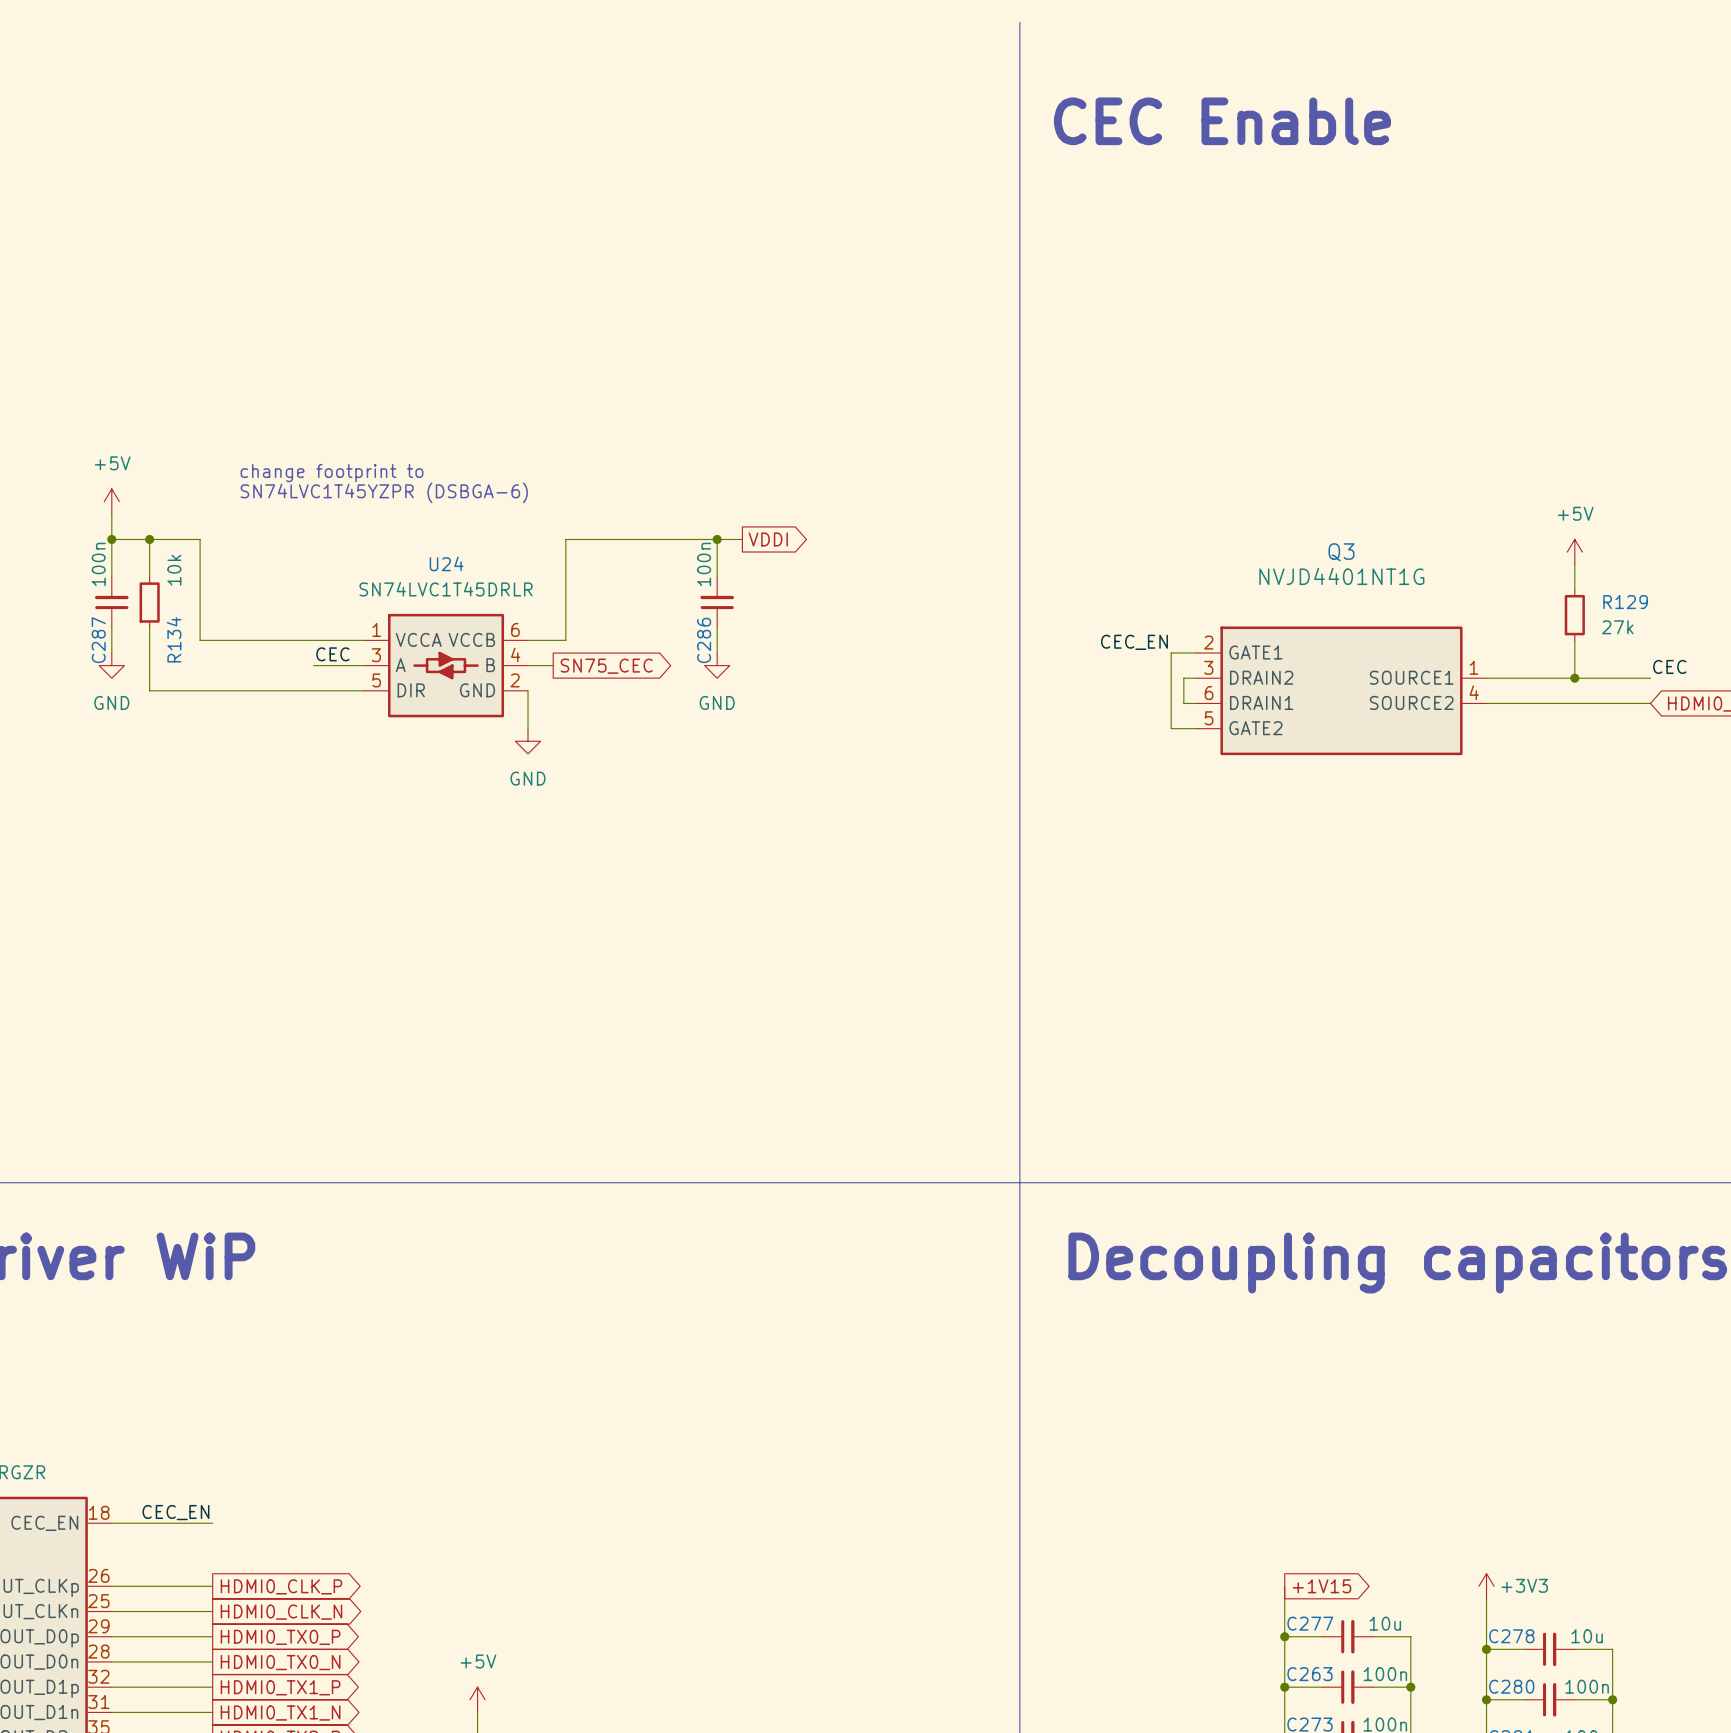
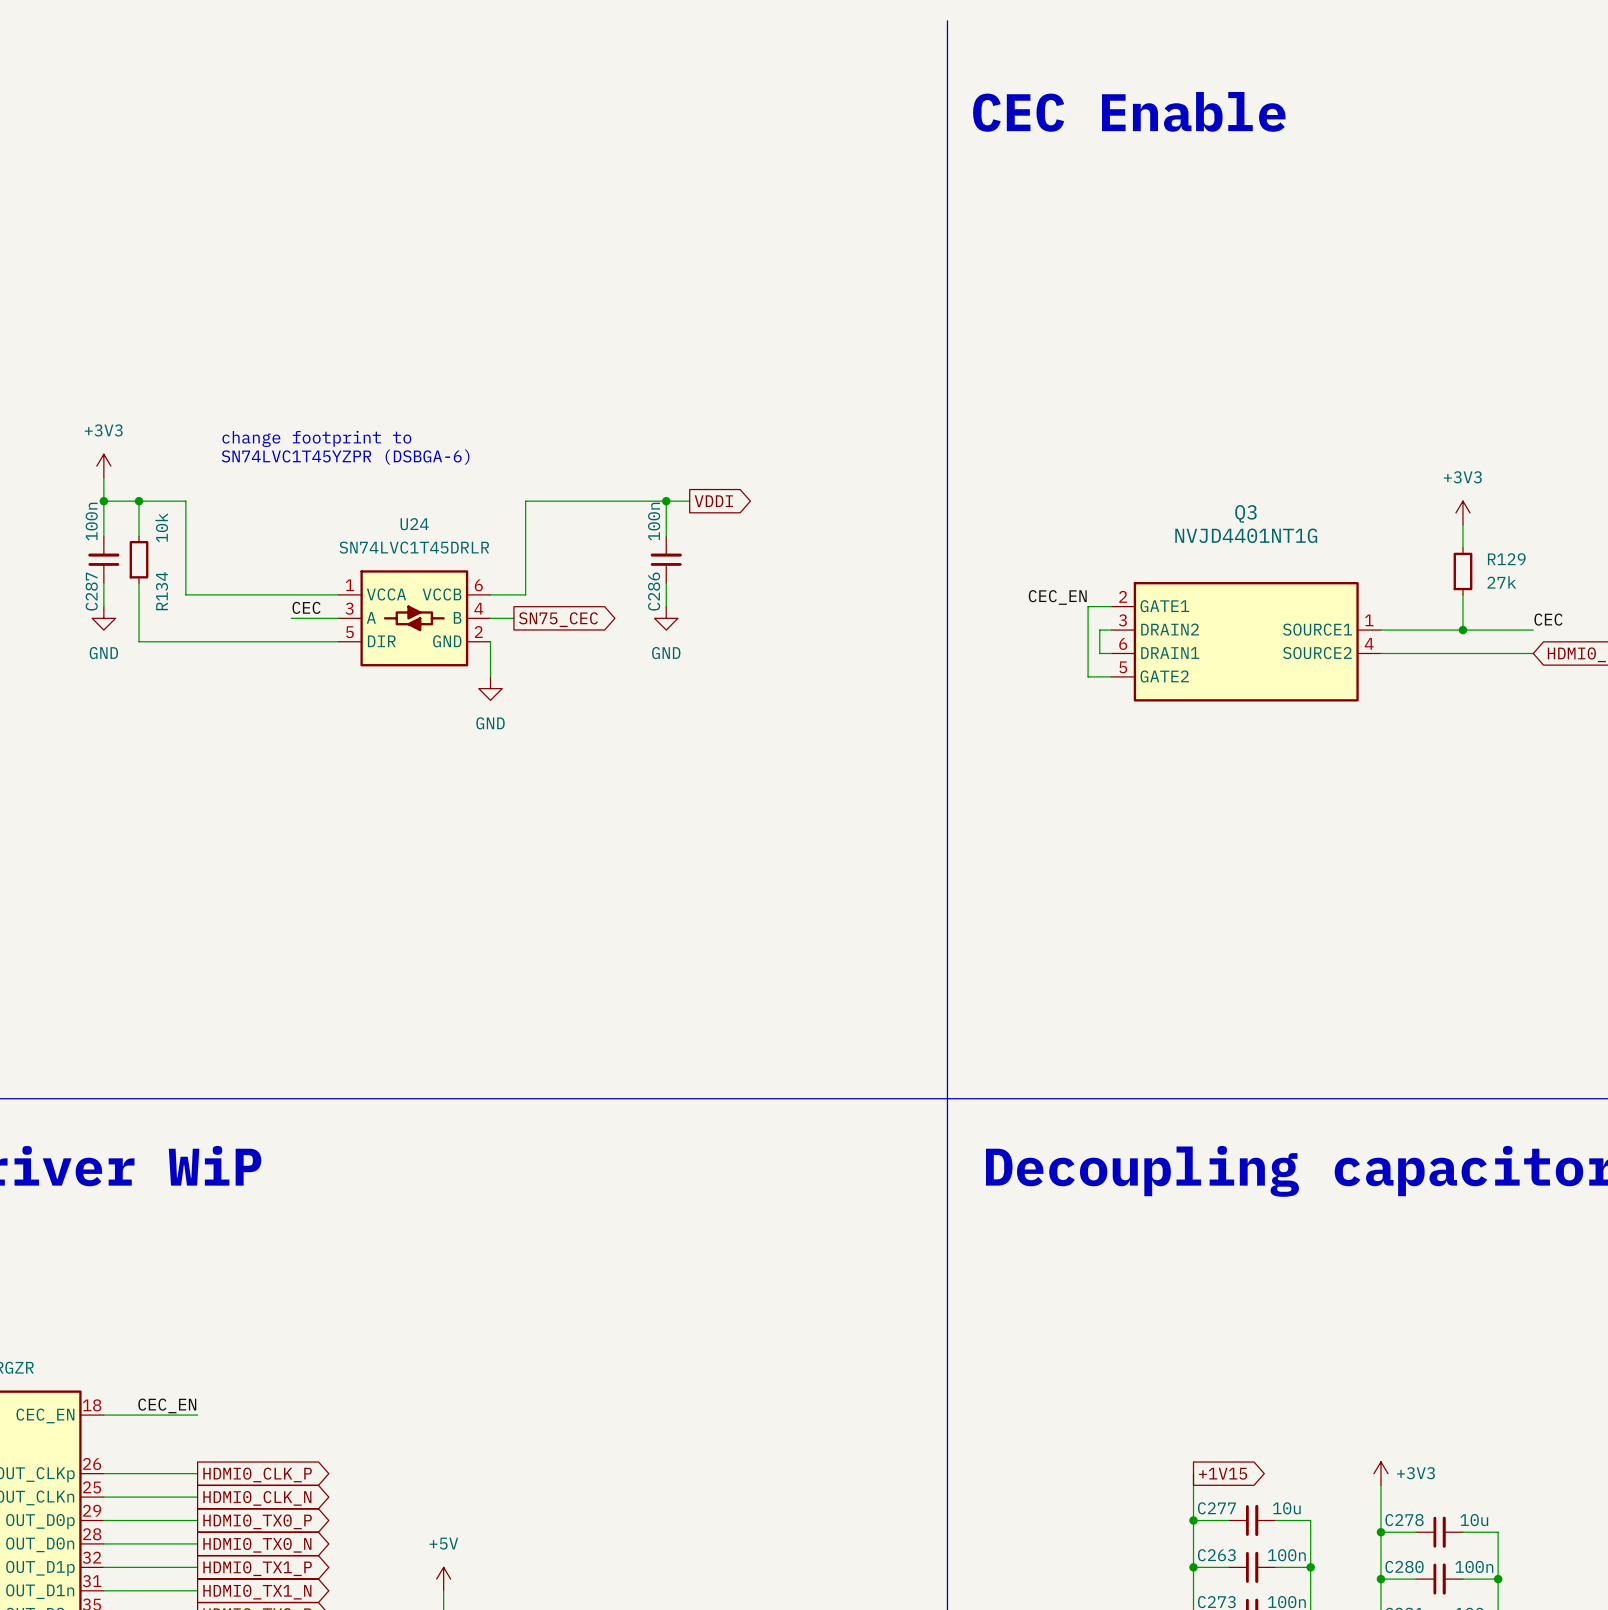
power symbol: +5V (111, 501) -> +3V3 (103, 466)
power symbol: +5V (1574, 552) -> +3V3 (1462, 512)

